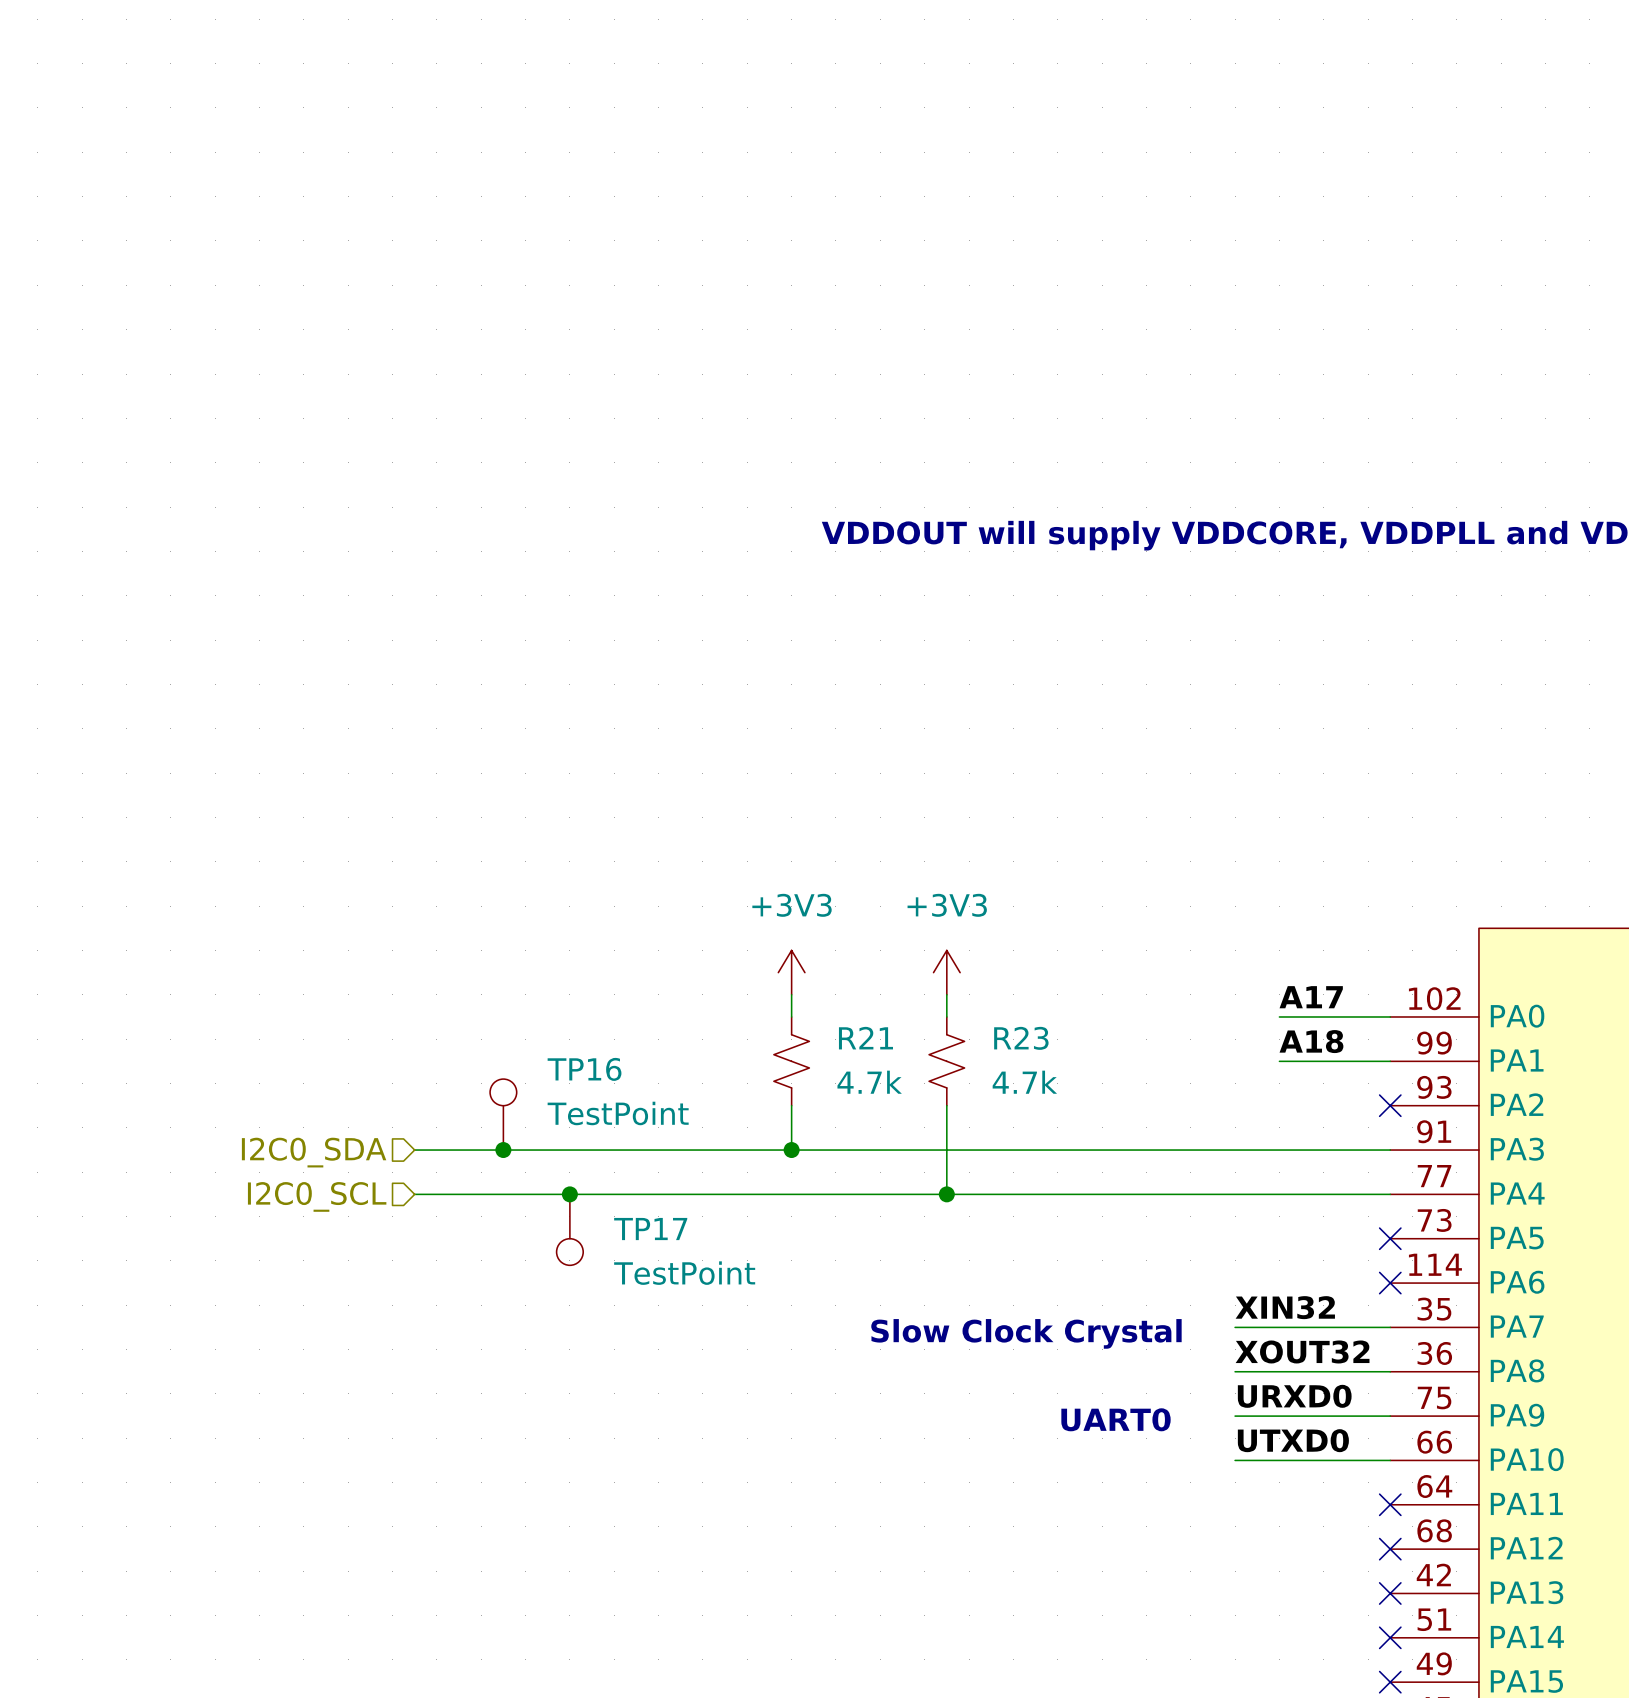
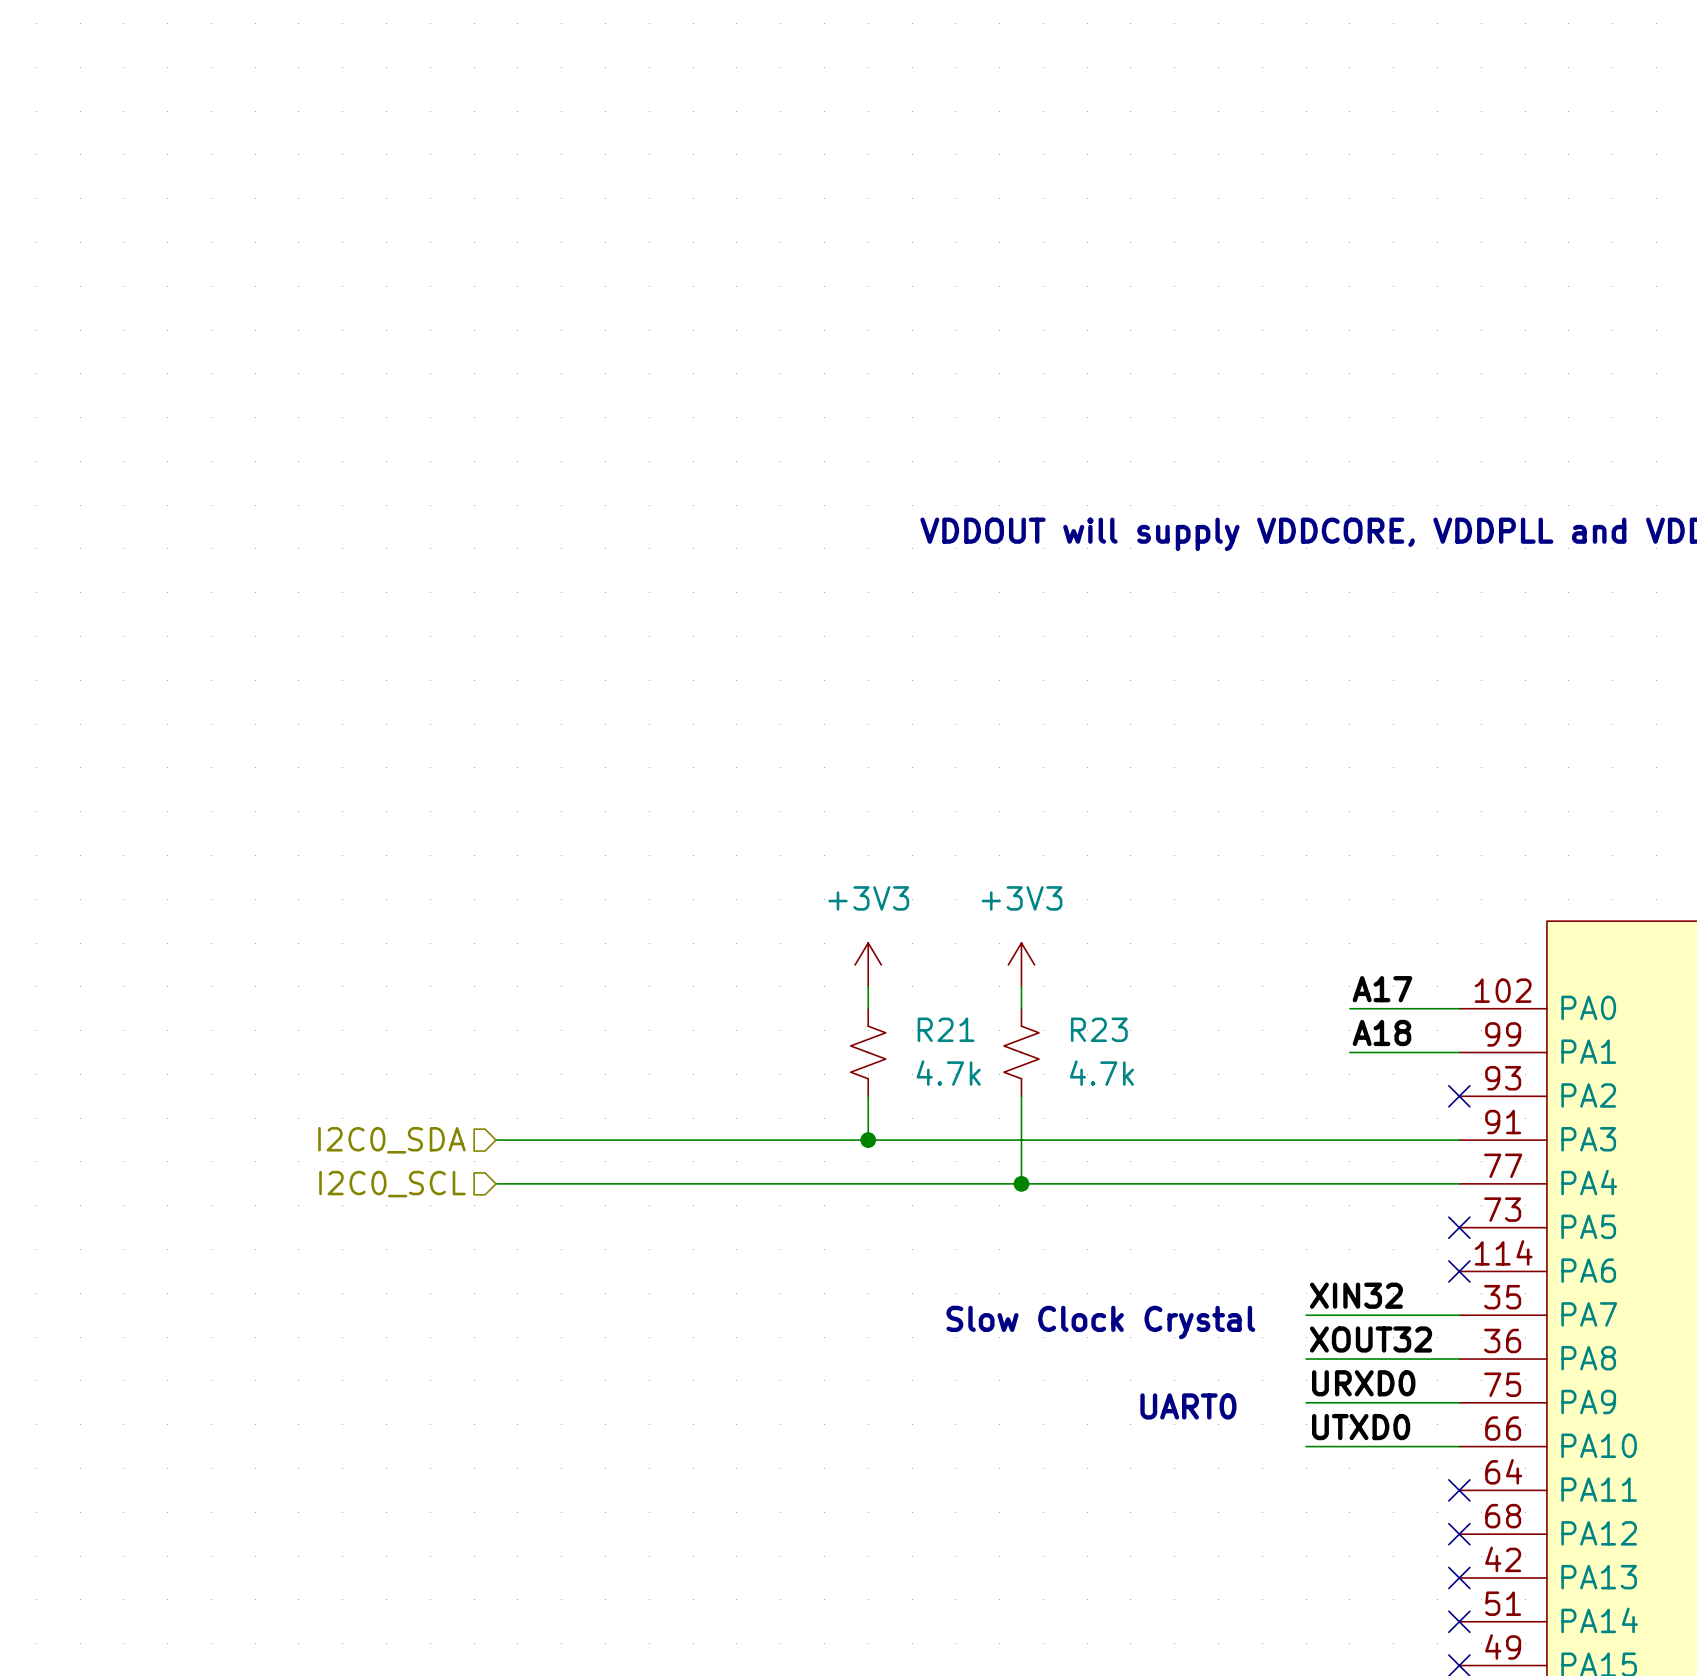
TP16: TestPoint (503, 1114) -> none
junction: (503, 1150) -> none
junction: (569, 1194) -> none
TP17: TestPoint (569, 1229) -> none

